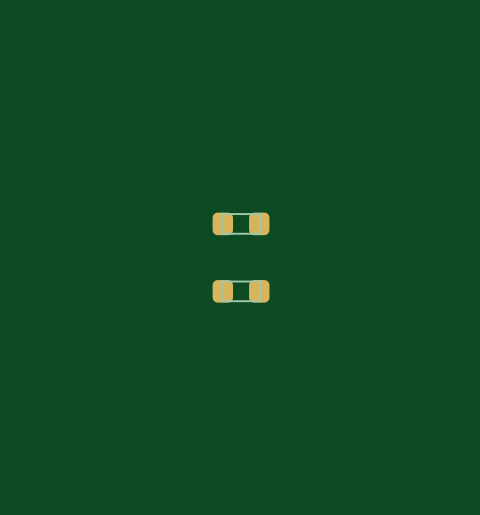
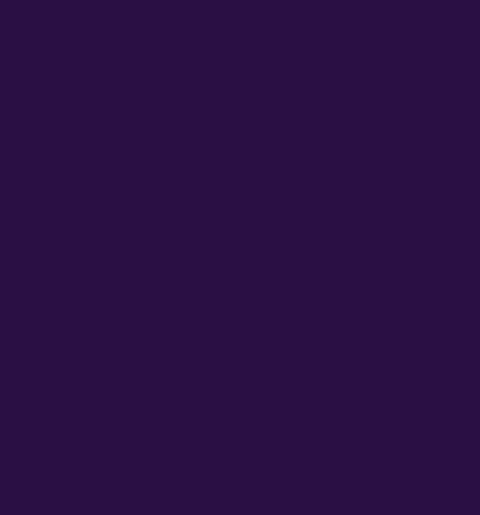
part: (241, 223) -> none
part: (241, 291) -> none

